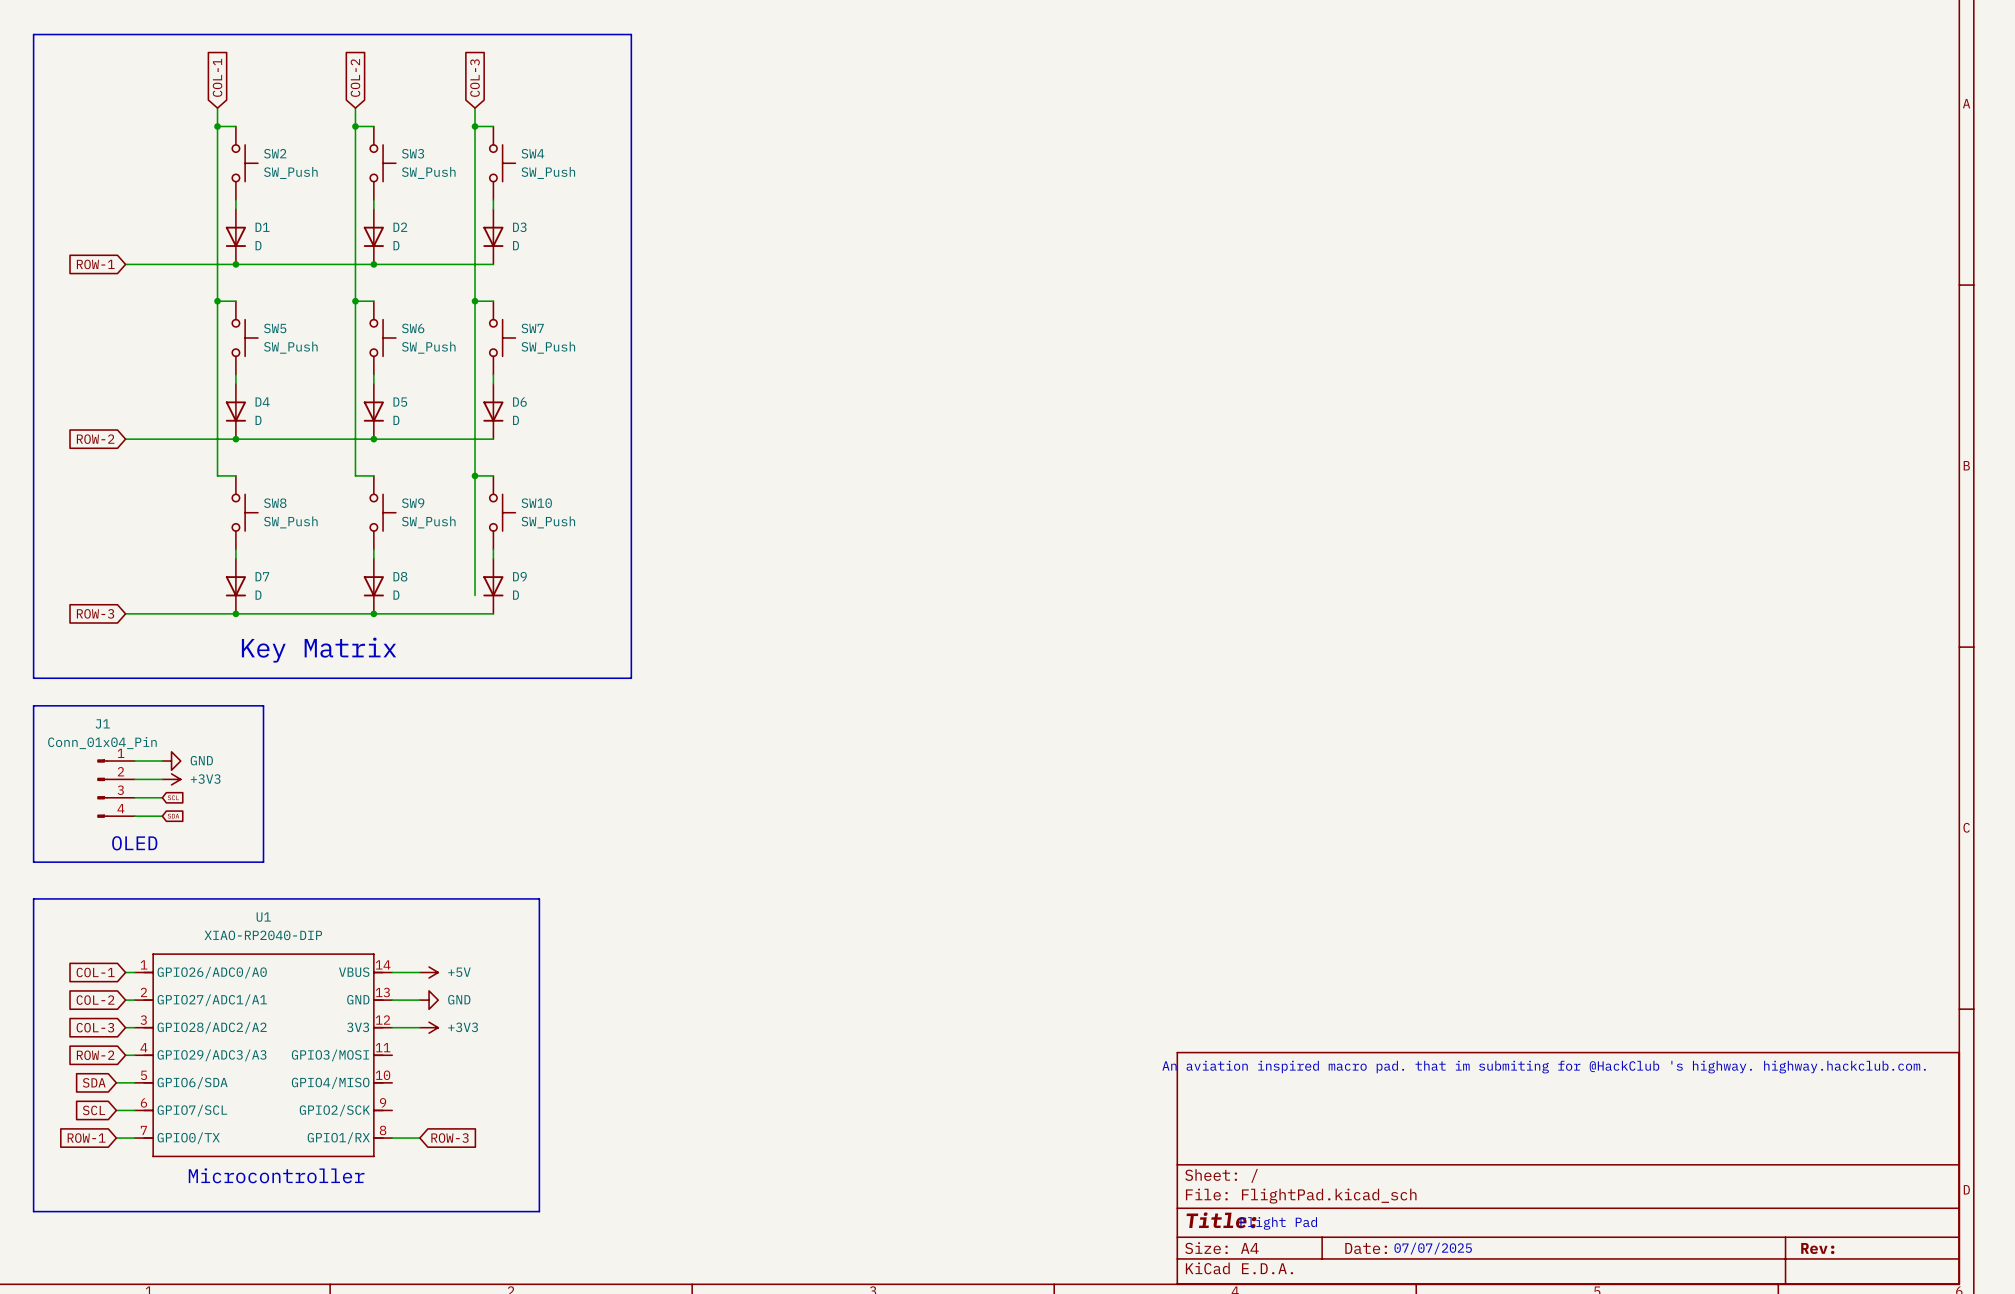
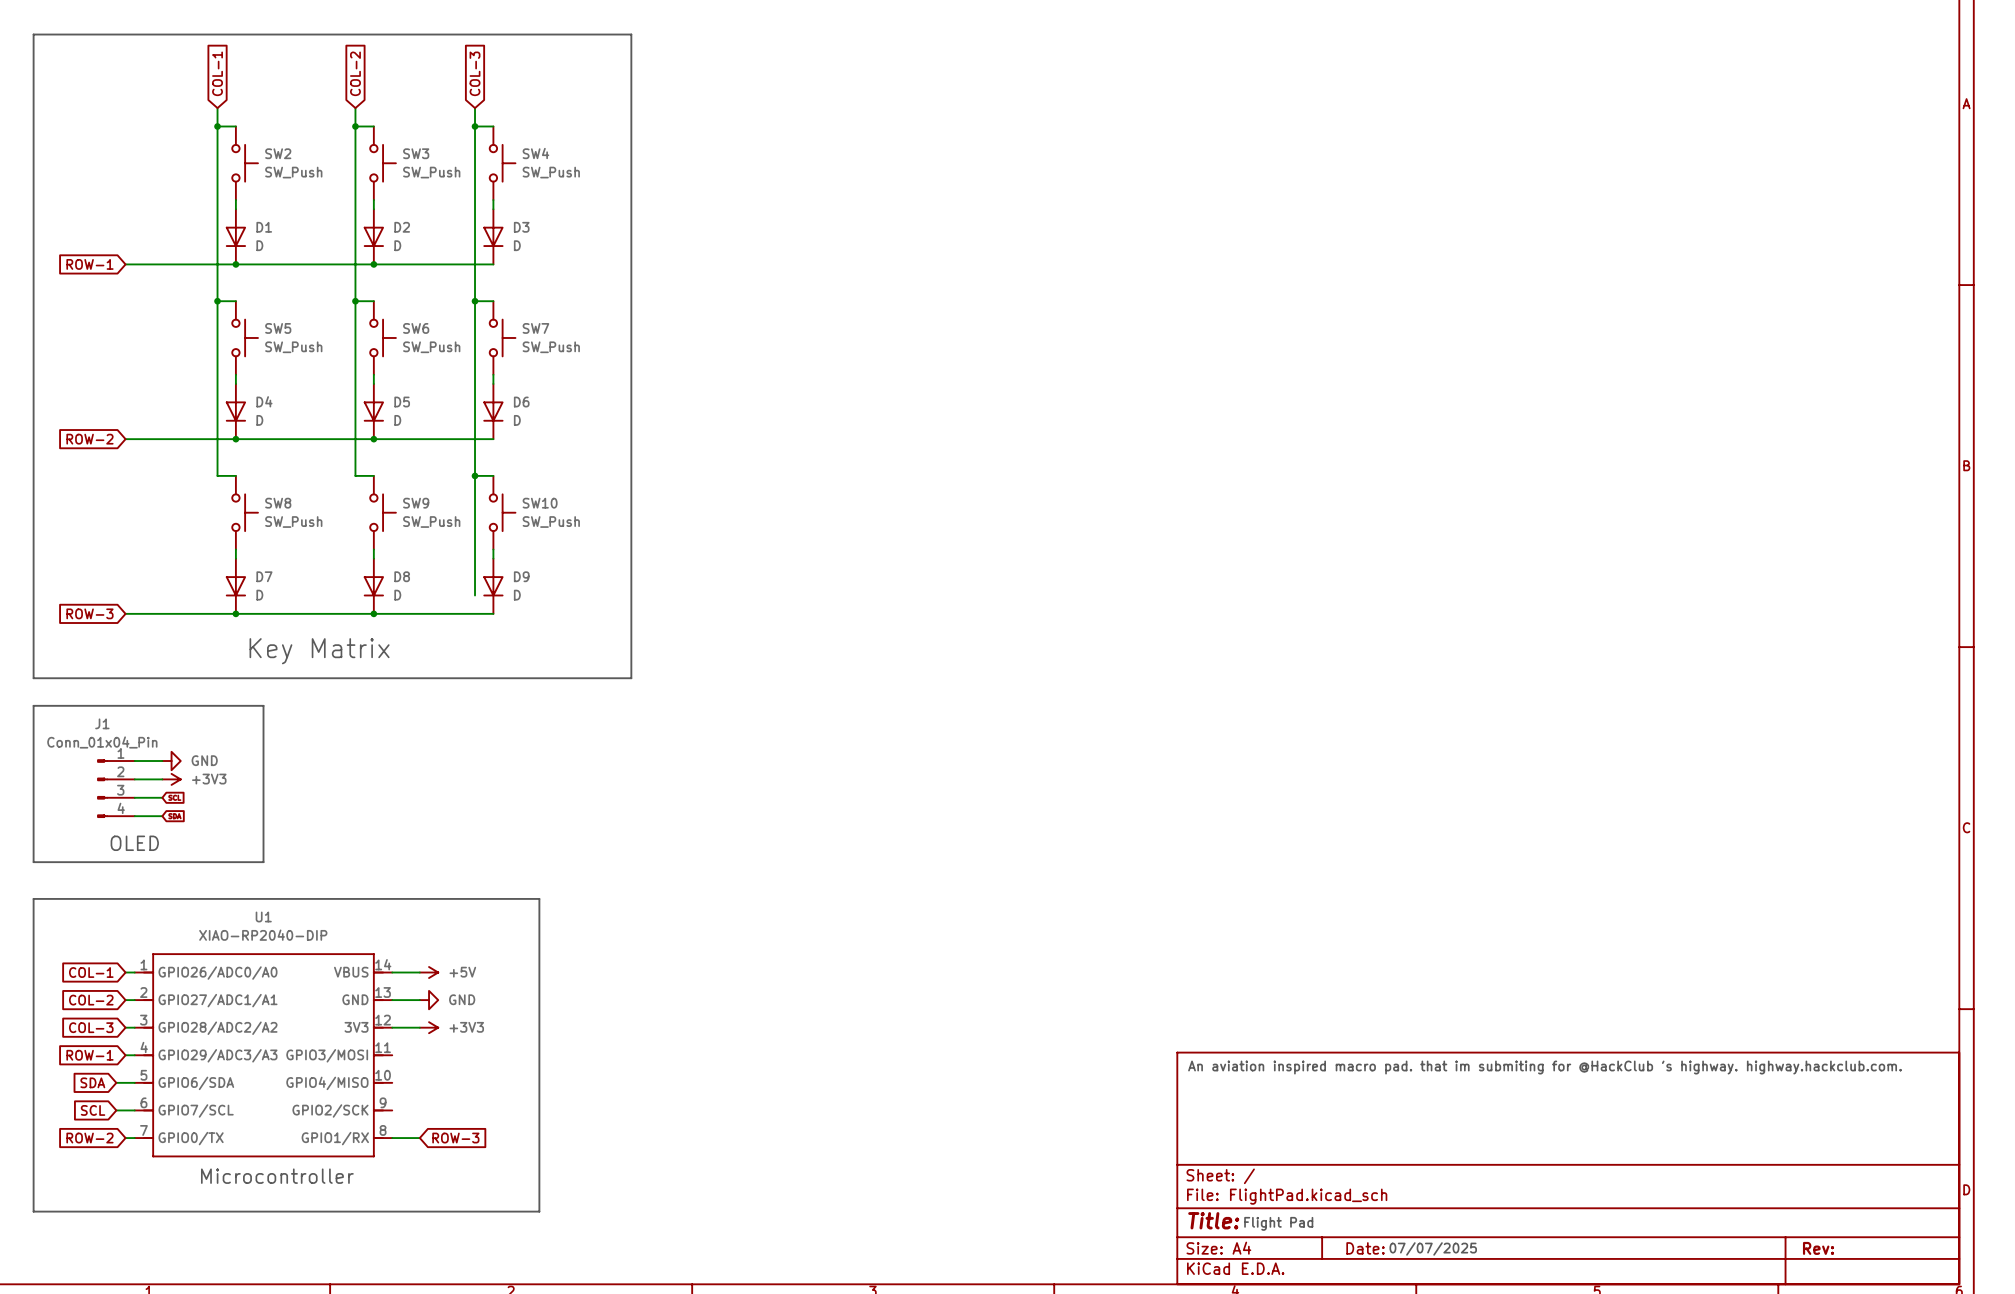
global label: ROW-2 (95, 1055) -> ROW-1 (89, 1055)
global label: ROW-1 (86, 1138) -> ROW-2 (89, 1138)
wire: (116, 1138) (125, 1138) -> none

